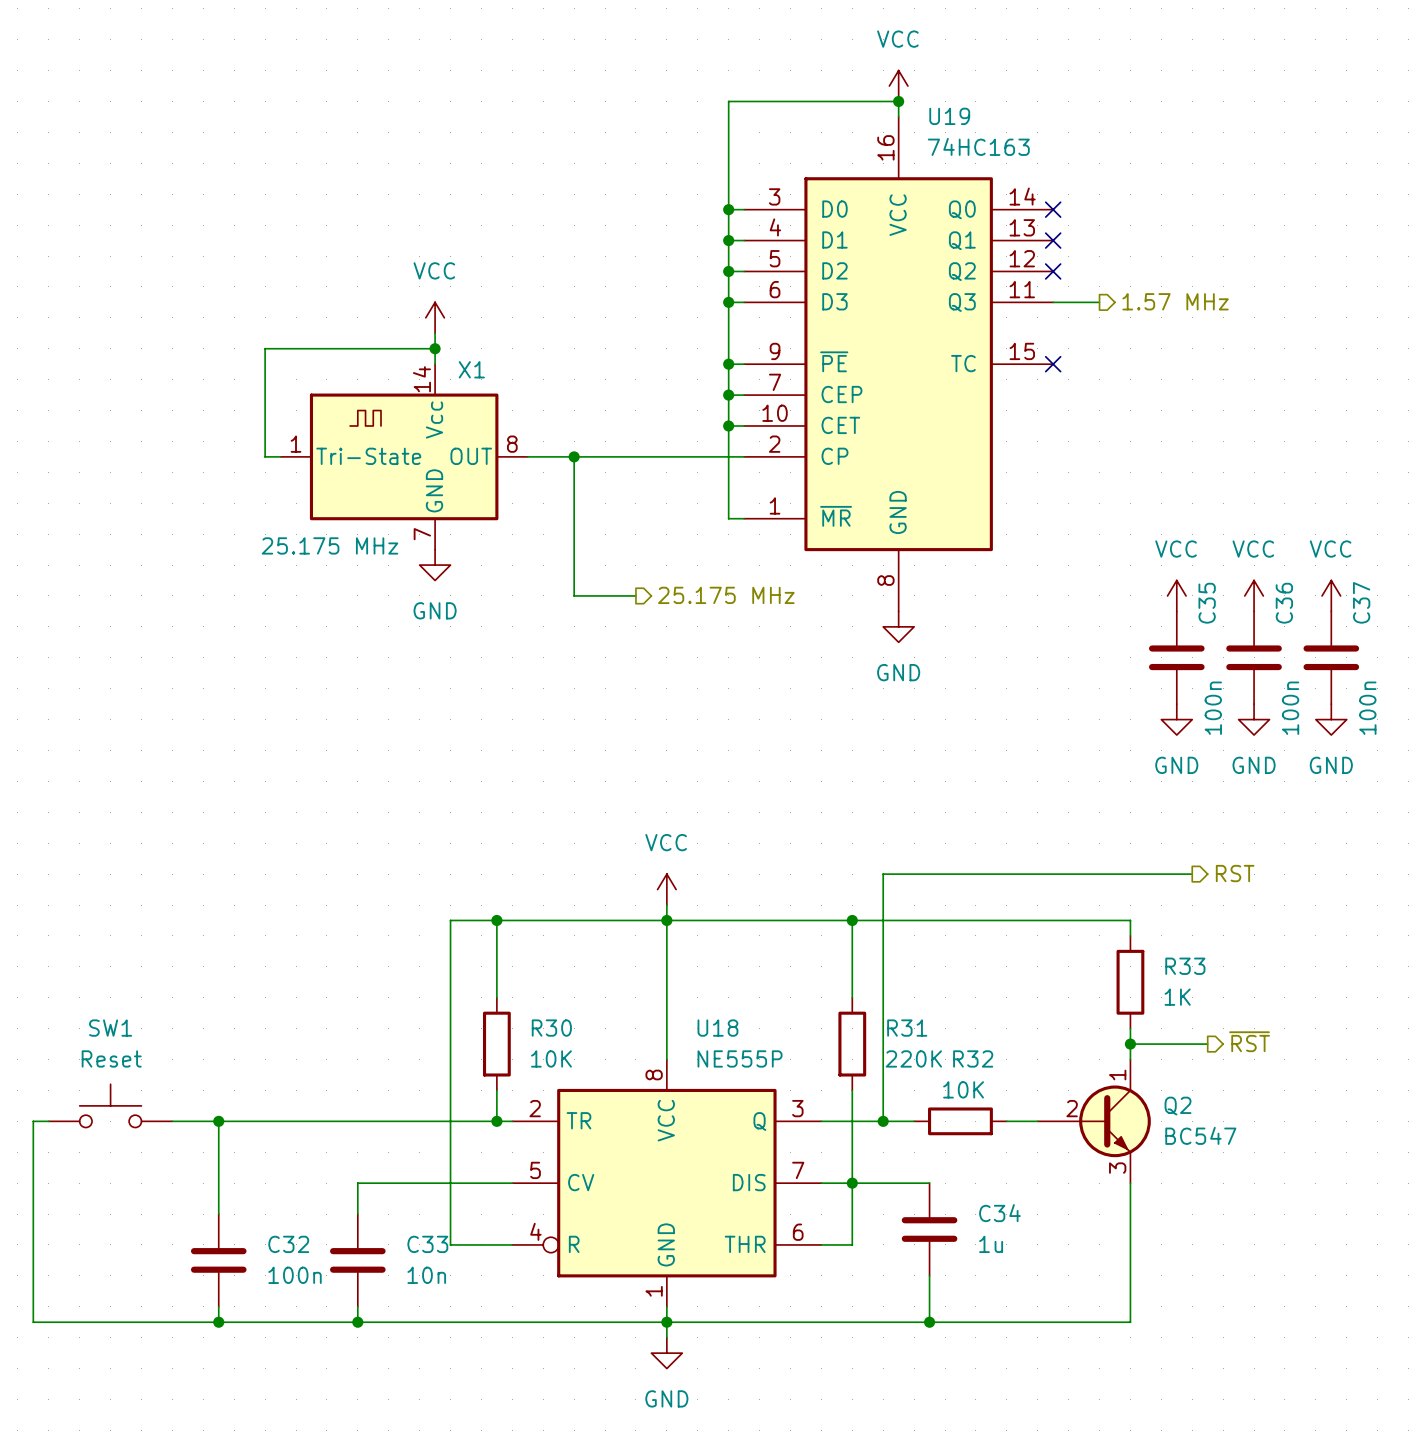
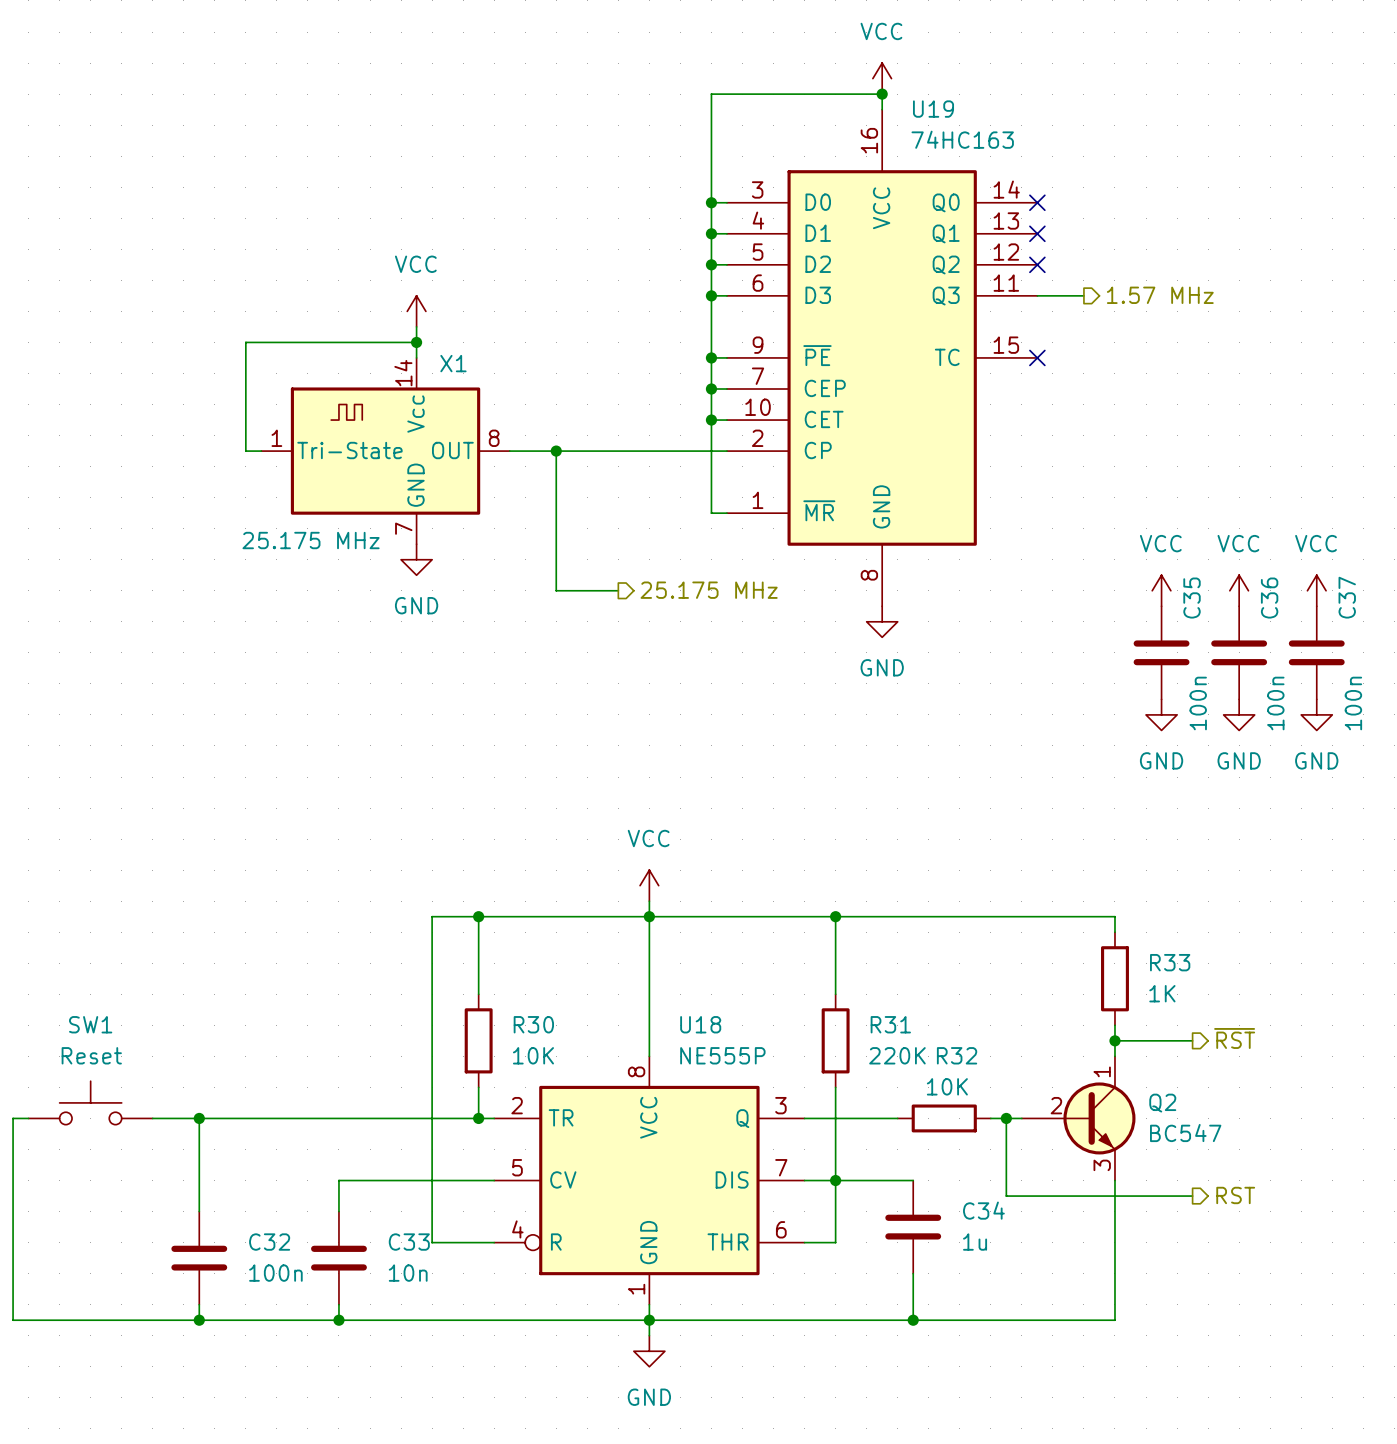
hierarchical label: RST (1235, 873) -> none
wire: (1192, 874) (883, 874) (883, 1121) -> none
junction: (883, 1121) -> none
wire: none -> (1006, 1118) (1006, 1196) (1192, 1196)
junction: none -> (1006, 1118)
hierarchical label: none -> RST (1235, 1195)

